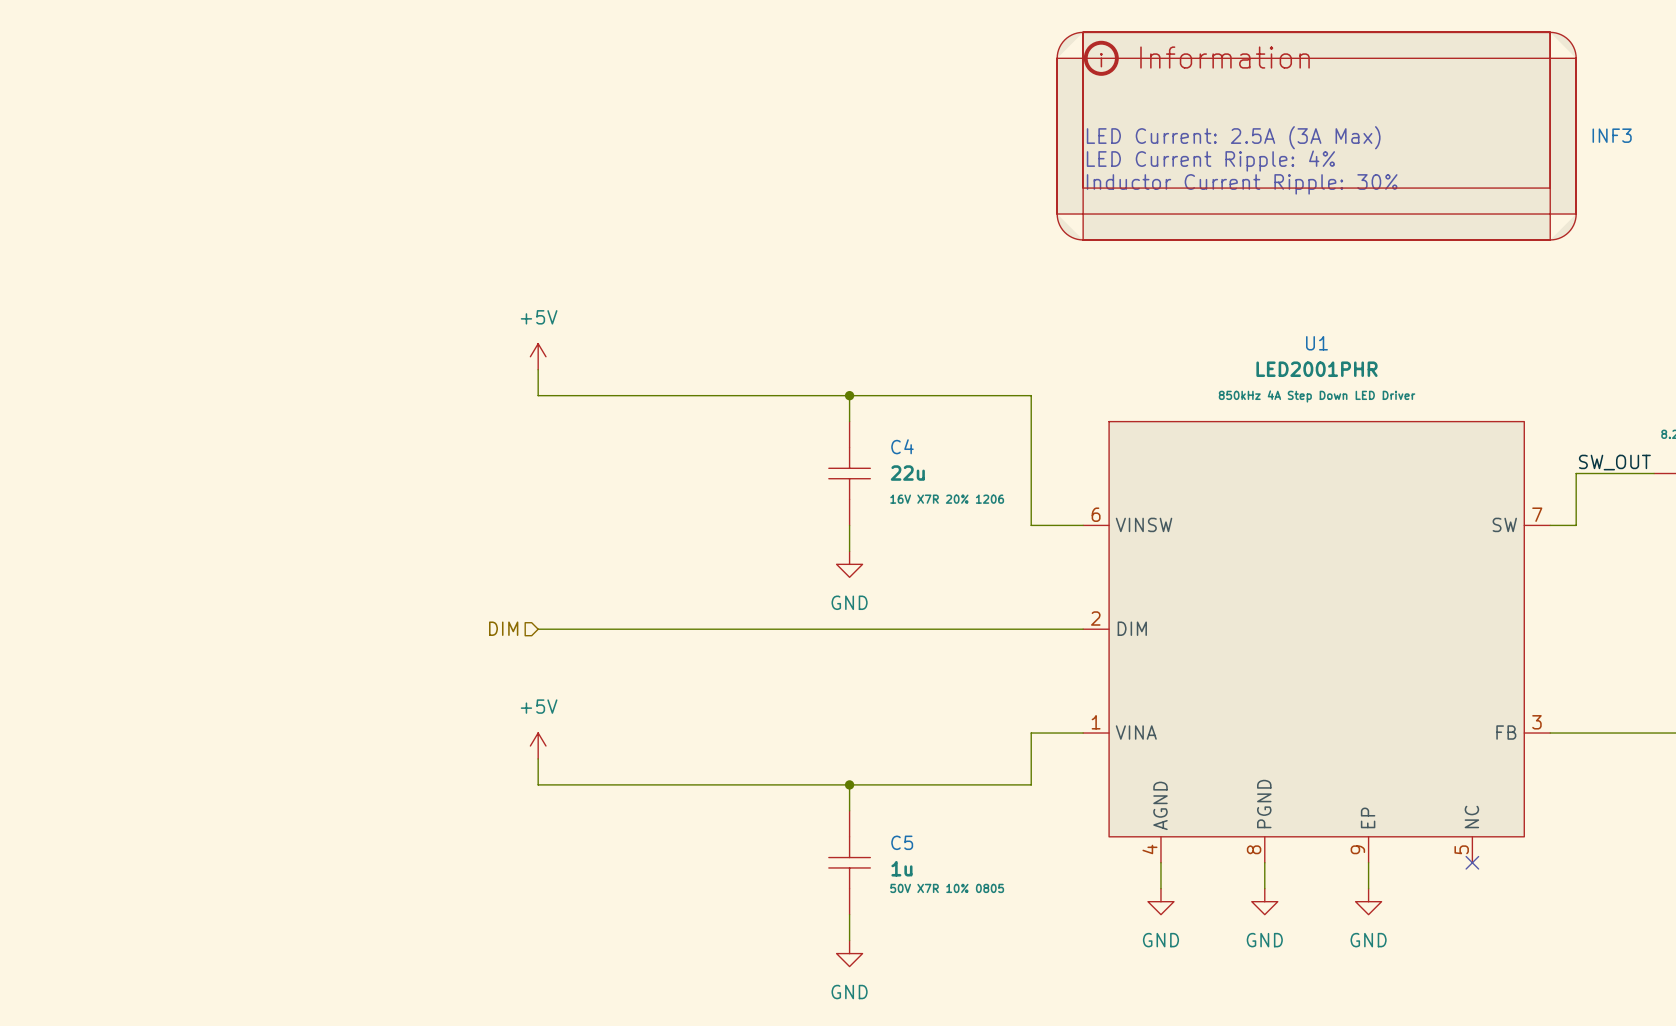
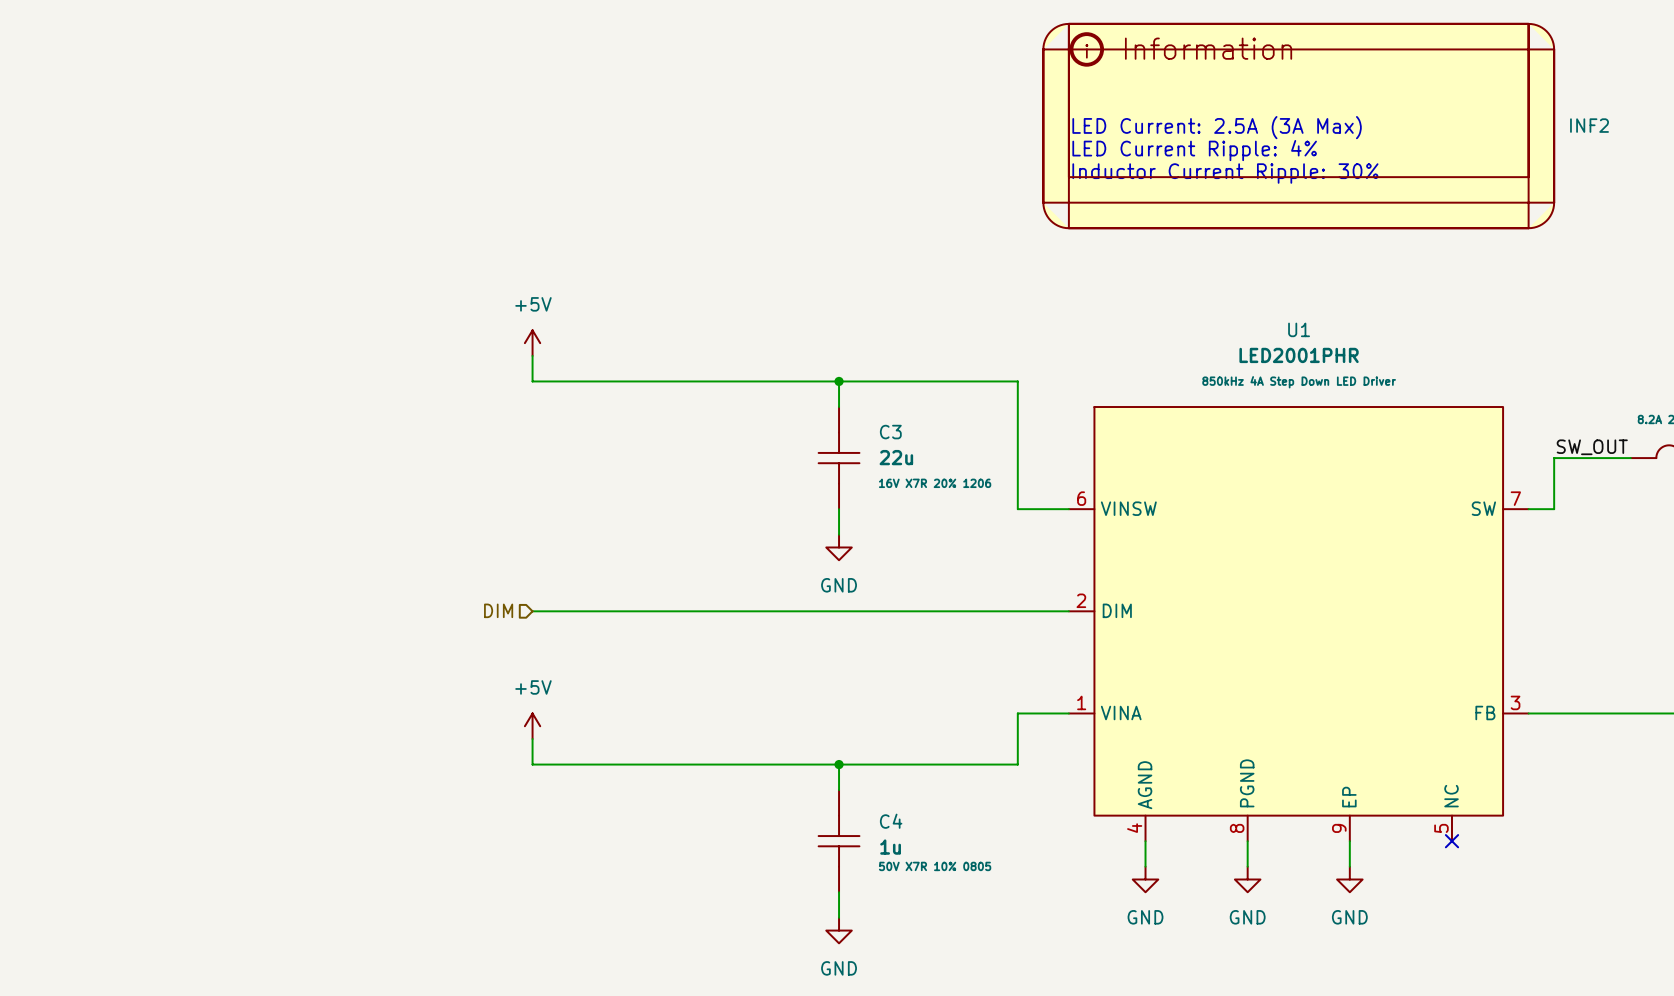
INF3 name: INF3 (1612, 135) -> INF2 (1589, 125)
C4 name: C4 (902, 446) -> C3 (890, 432)
C5 name: C5 (902, 842) -> C4 (891, 821)

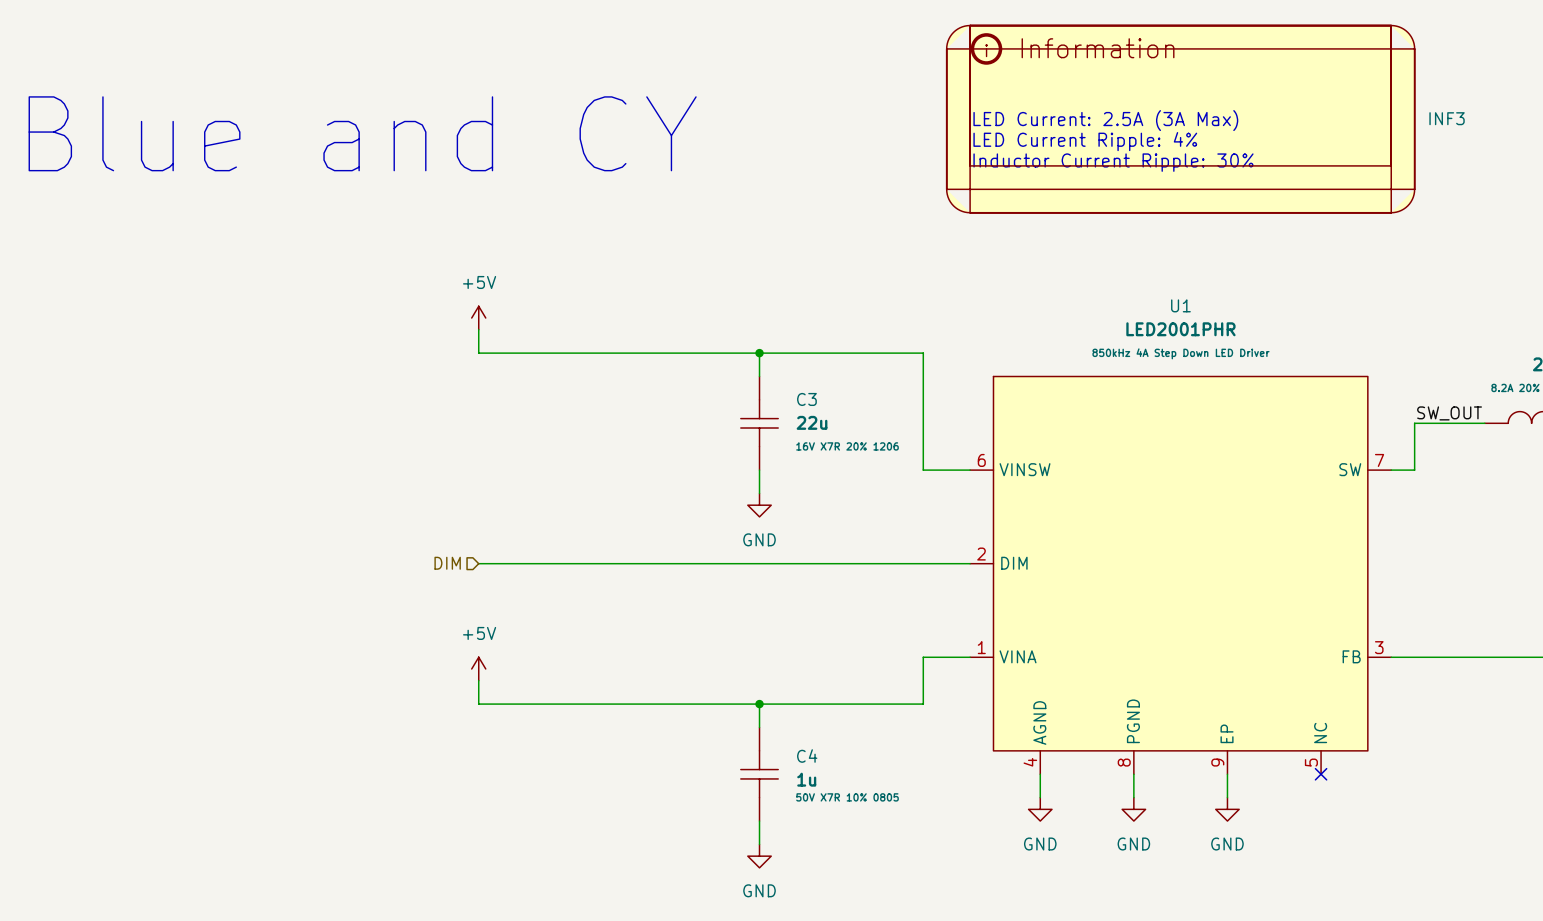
INF2 name: INF2 (1589, 125) -> INF3 (1447, 118)
text: none -> Blue and CY (362, 133)

